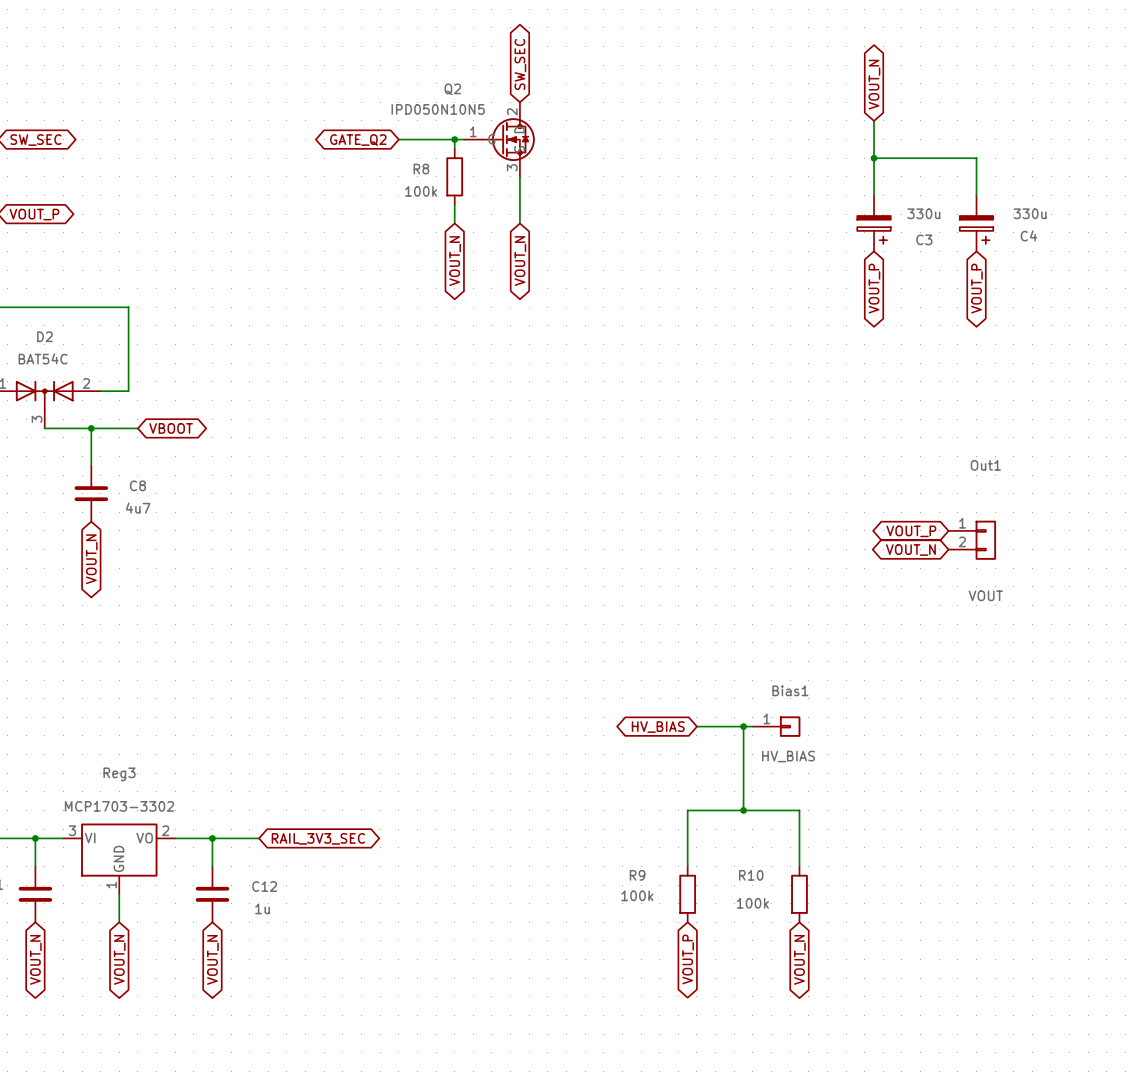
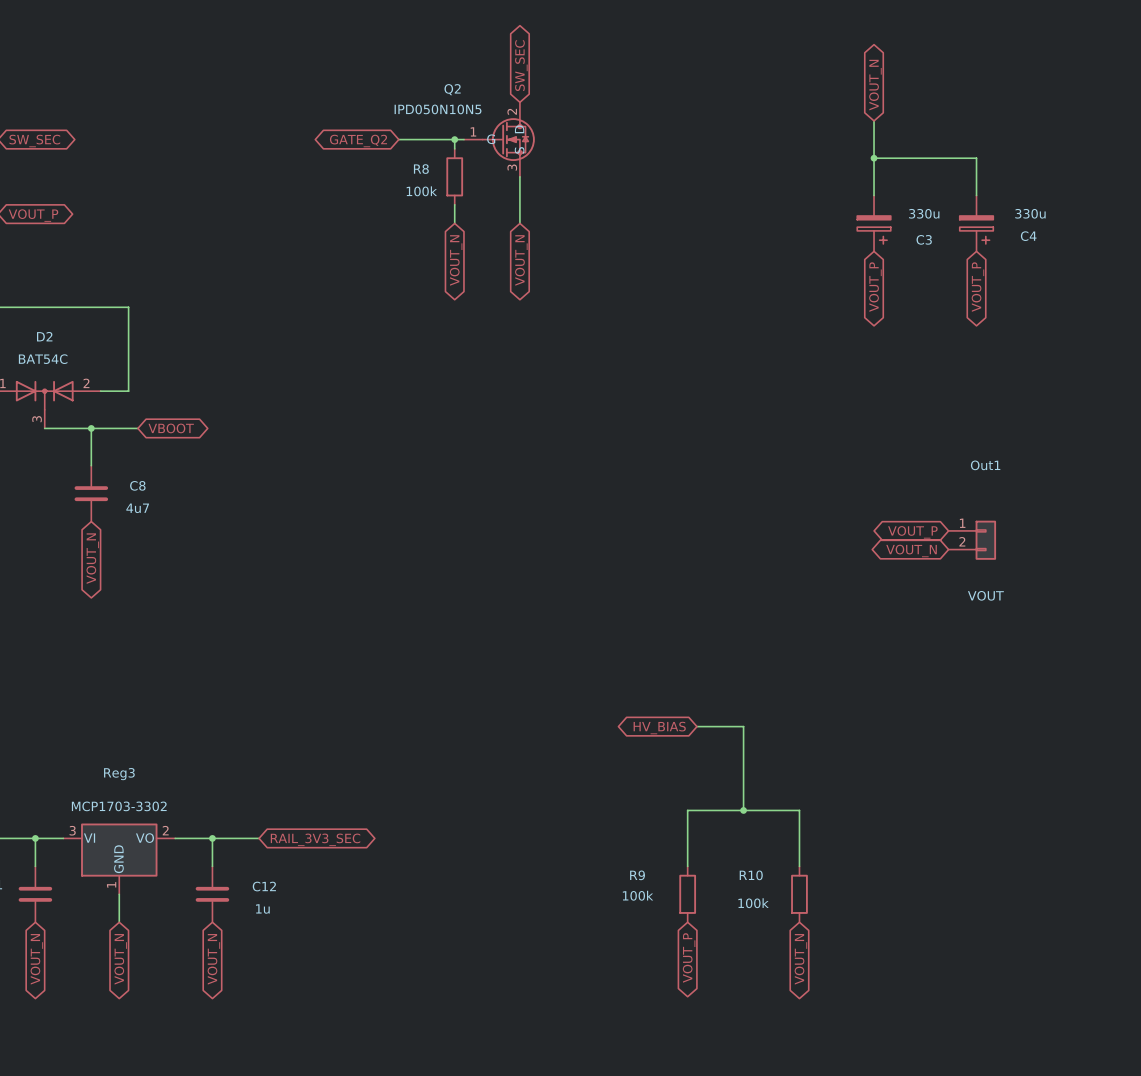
wire: (743, 726) (752, 726) -> none
junction: (743, 726) -> none
Bias1: HV_BIAS (776, 726) -> none

